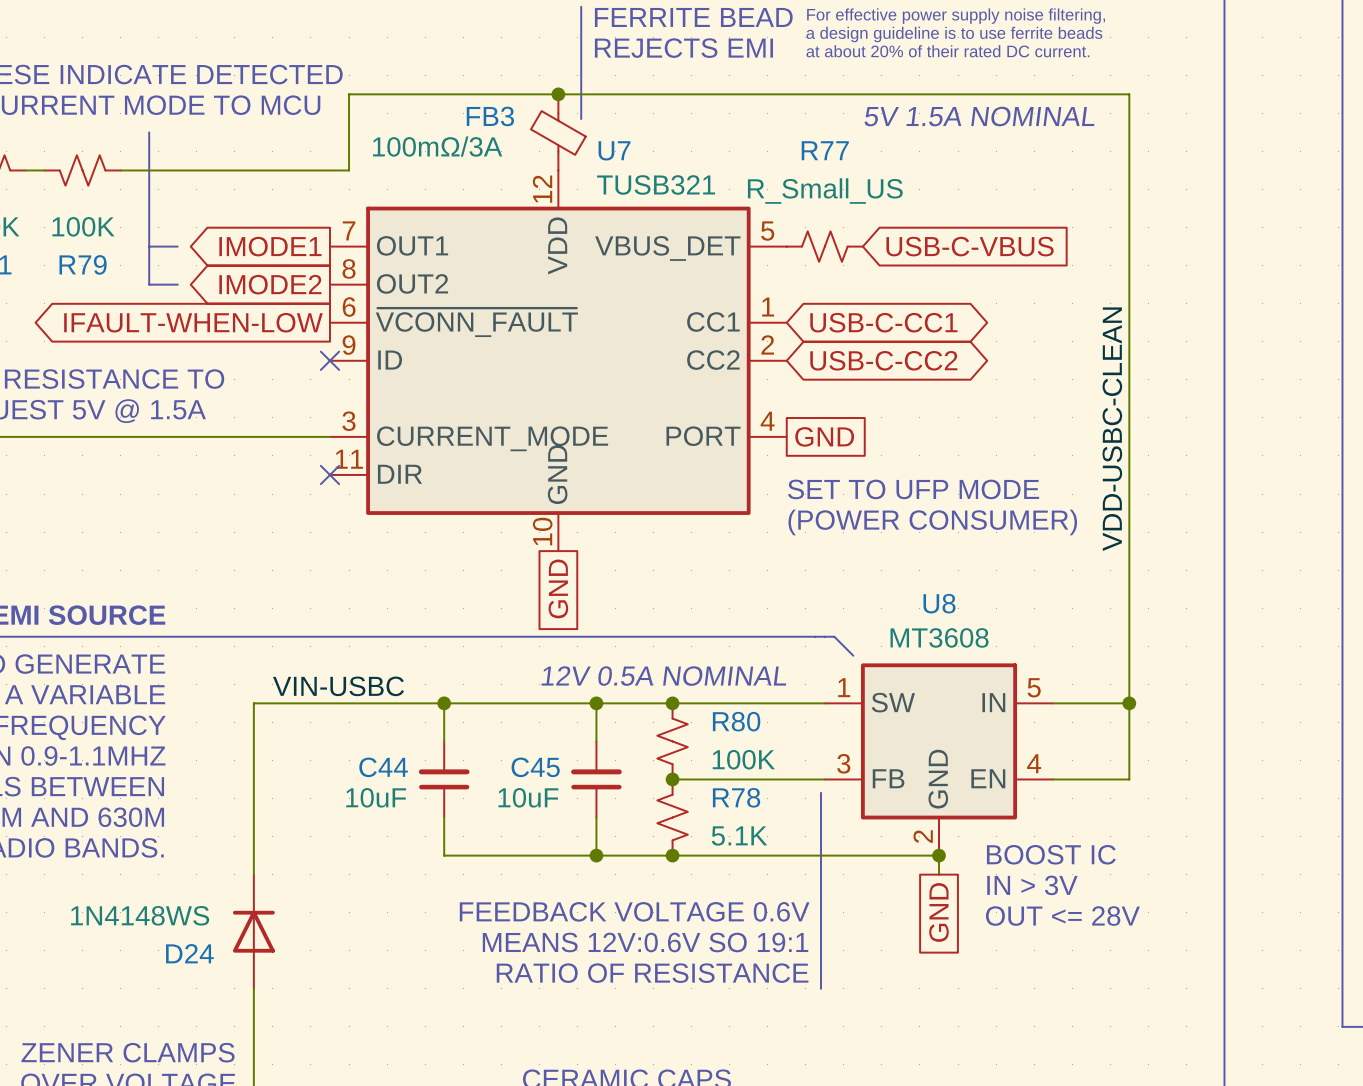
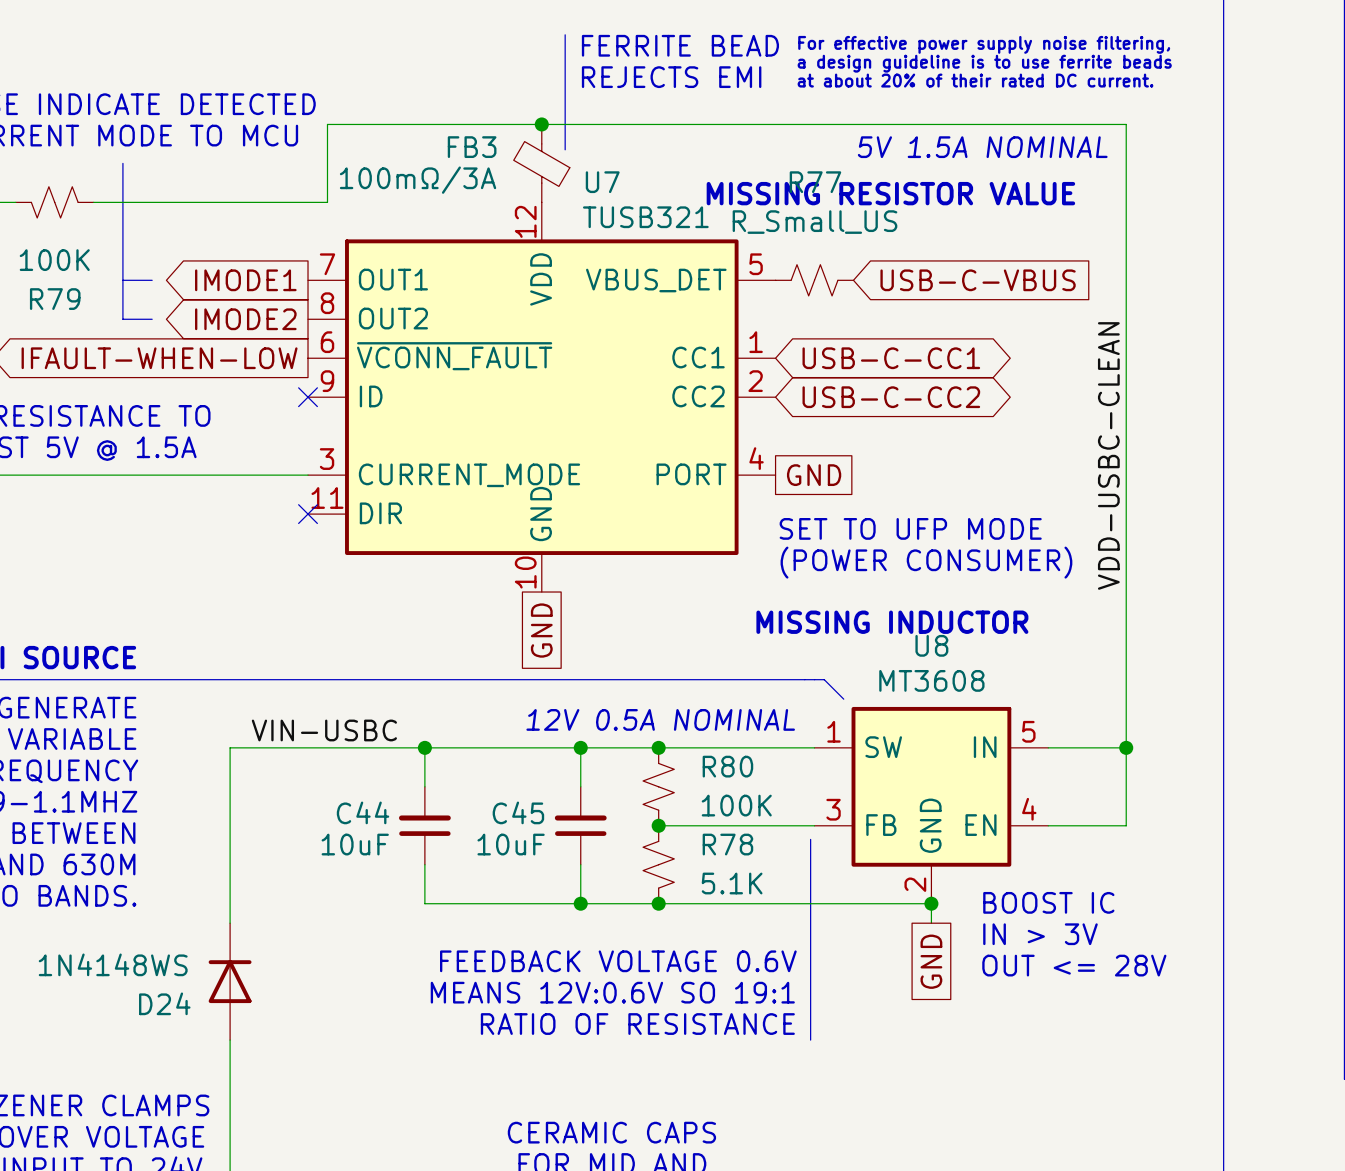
text: none -> MISSING RESISTOR VALUE (890, 193)
text: none -> MISSING INDUCTOR (892, 622)

